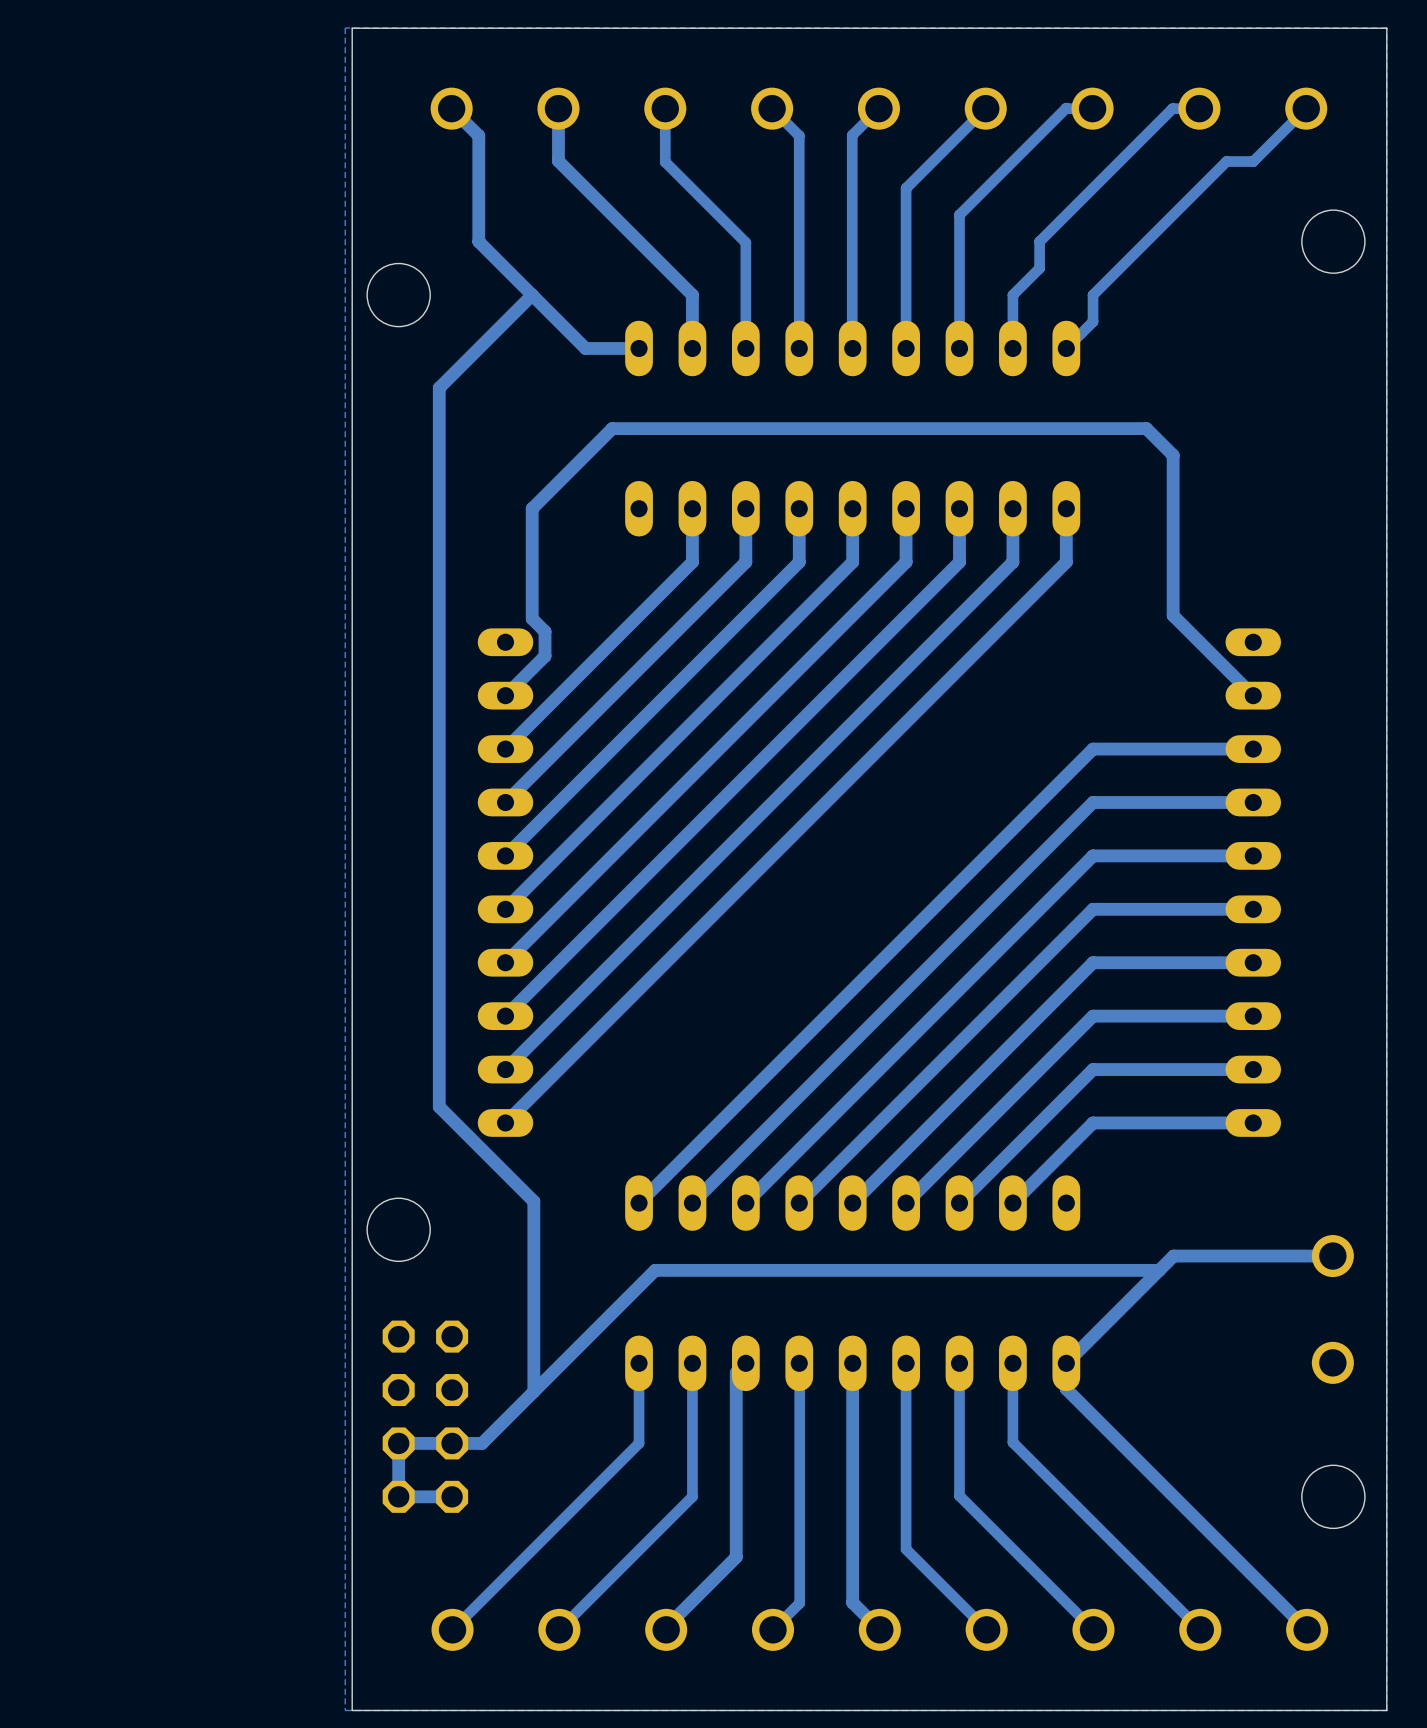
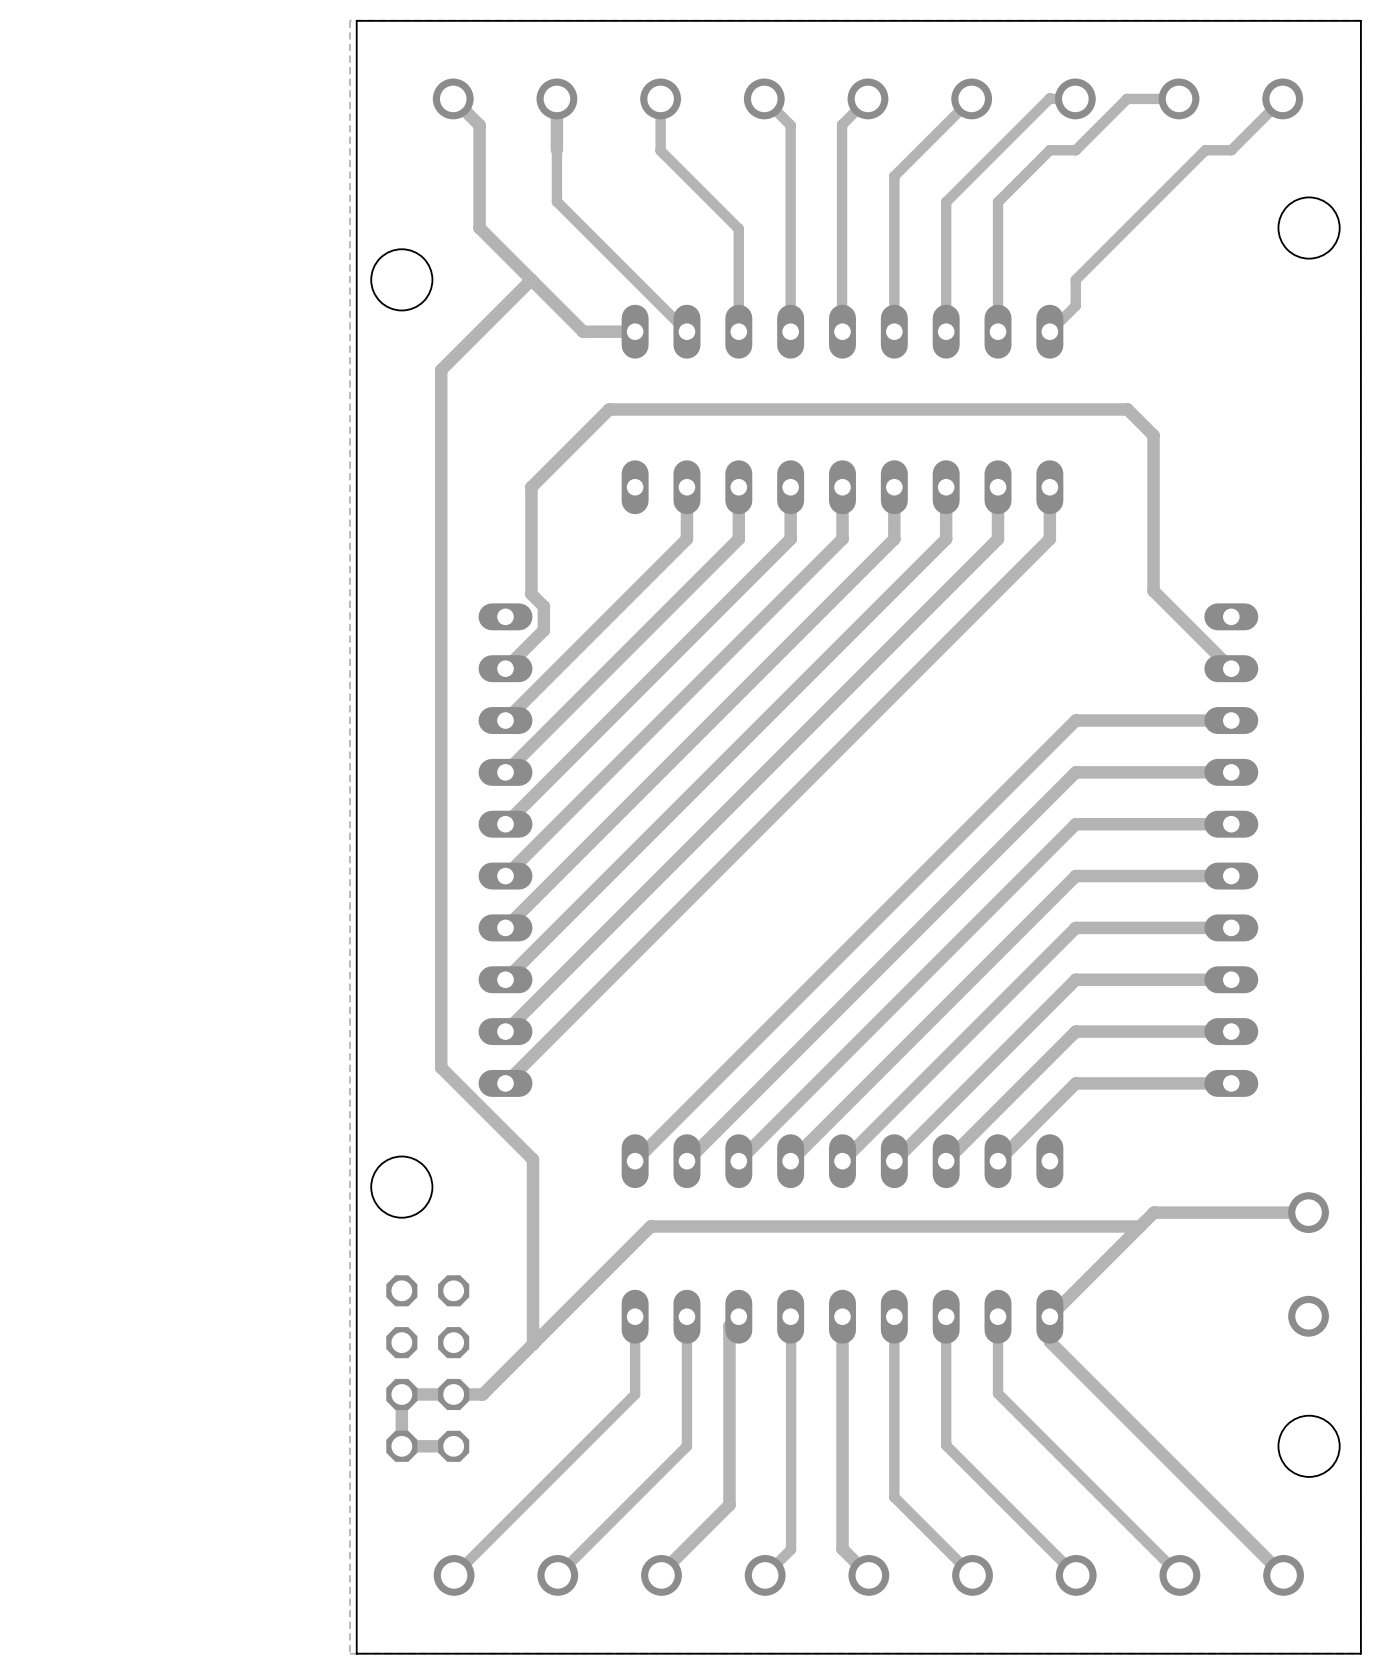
track: (1172, 108) (1039, 241) (1039, 268) (1012, 295) -> (1153, 98) (1127, 98) (1075, 150) (1049, 150) (998, 202) (998, 279)
track: (558, 161) (692, 295) (692, 348) -> (556, 149) (556, 201) (686, 331)

